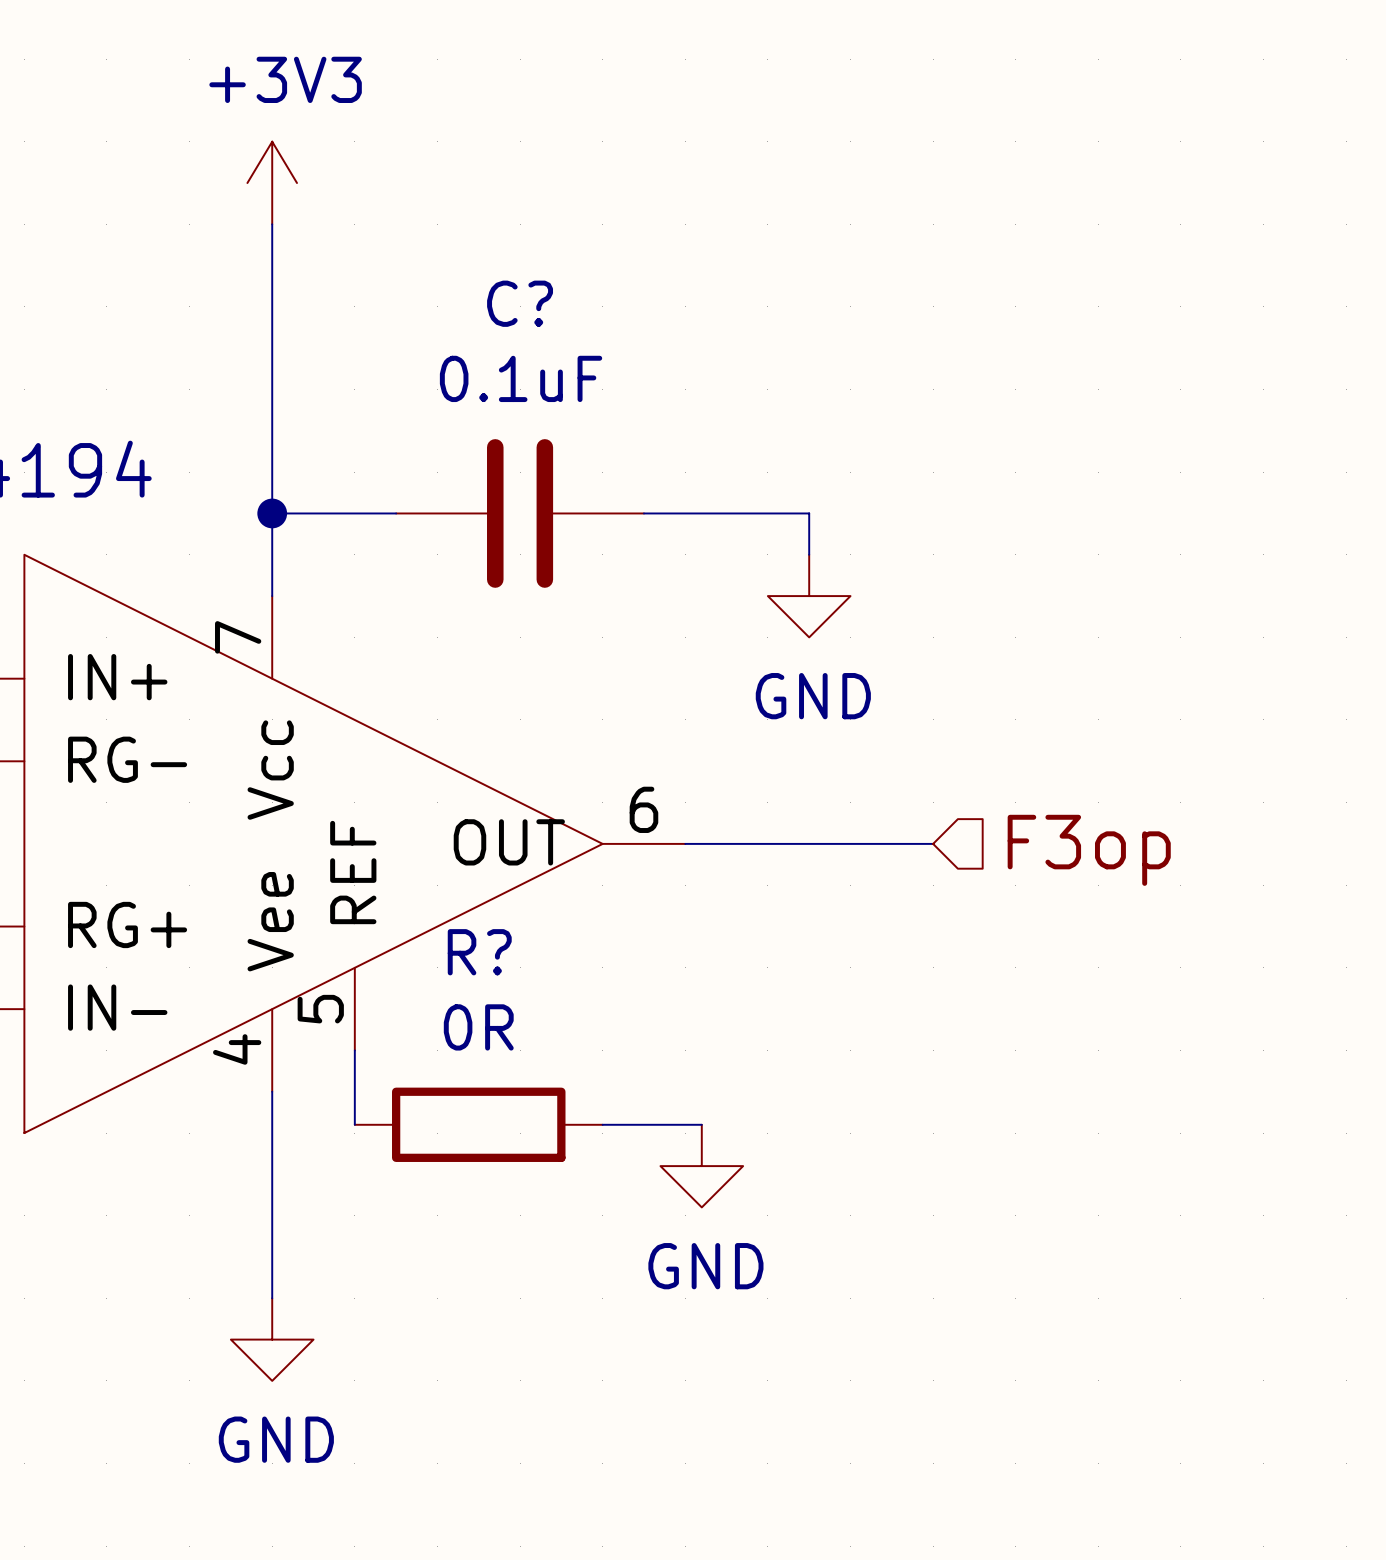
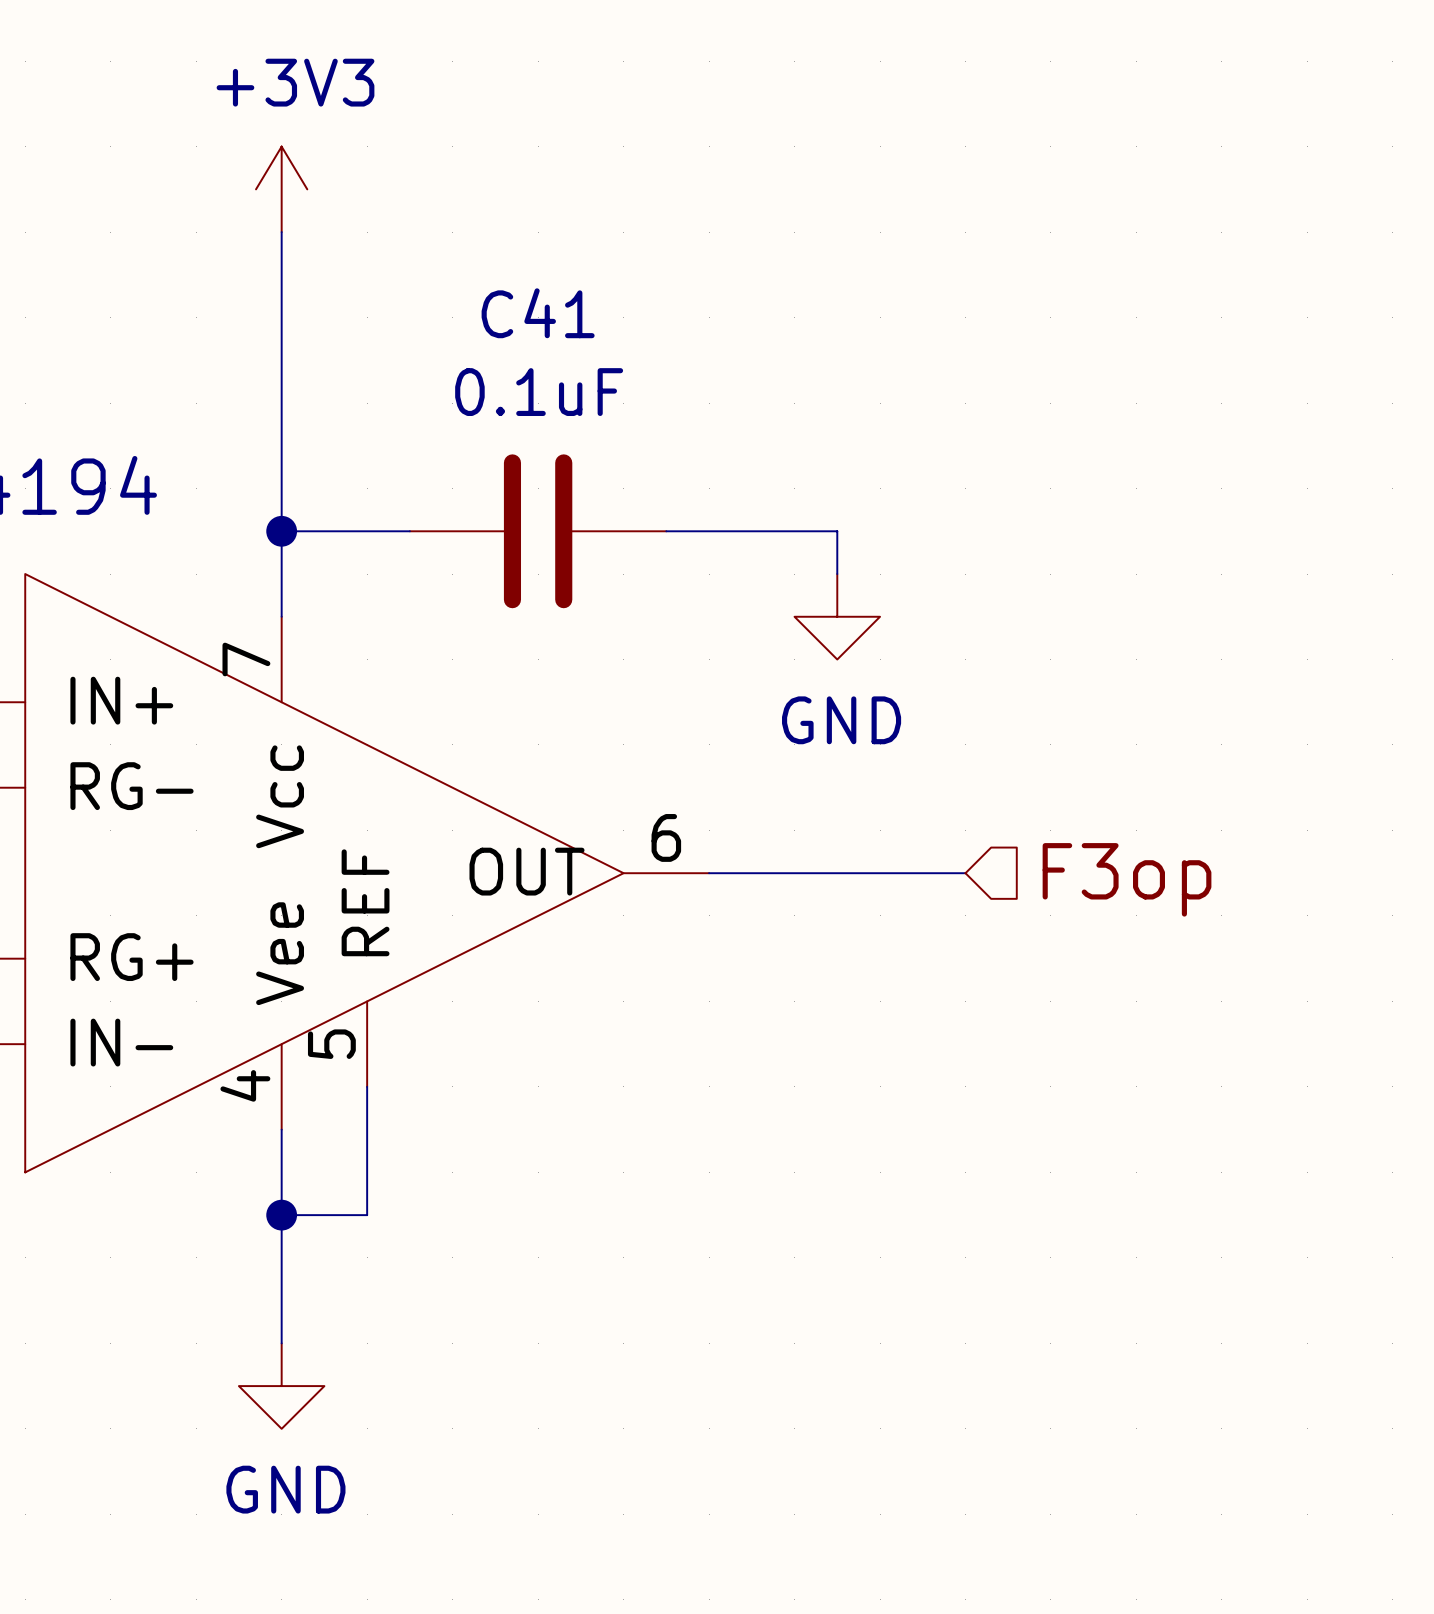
C? name: C? (520, 303) -> C41 (538, 313)
wire: none -> (367, 1163) (367, 1215) (281, 1215)
R?: 0R (478, 1124) -> none
wire: (602, 1124) (701, 1124) -> none
power symbol: GND (701, 1166) -> none
junction: none -> (281, 1215)

